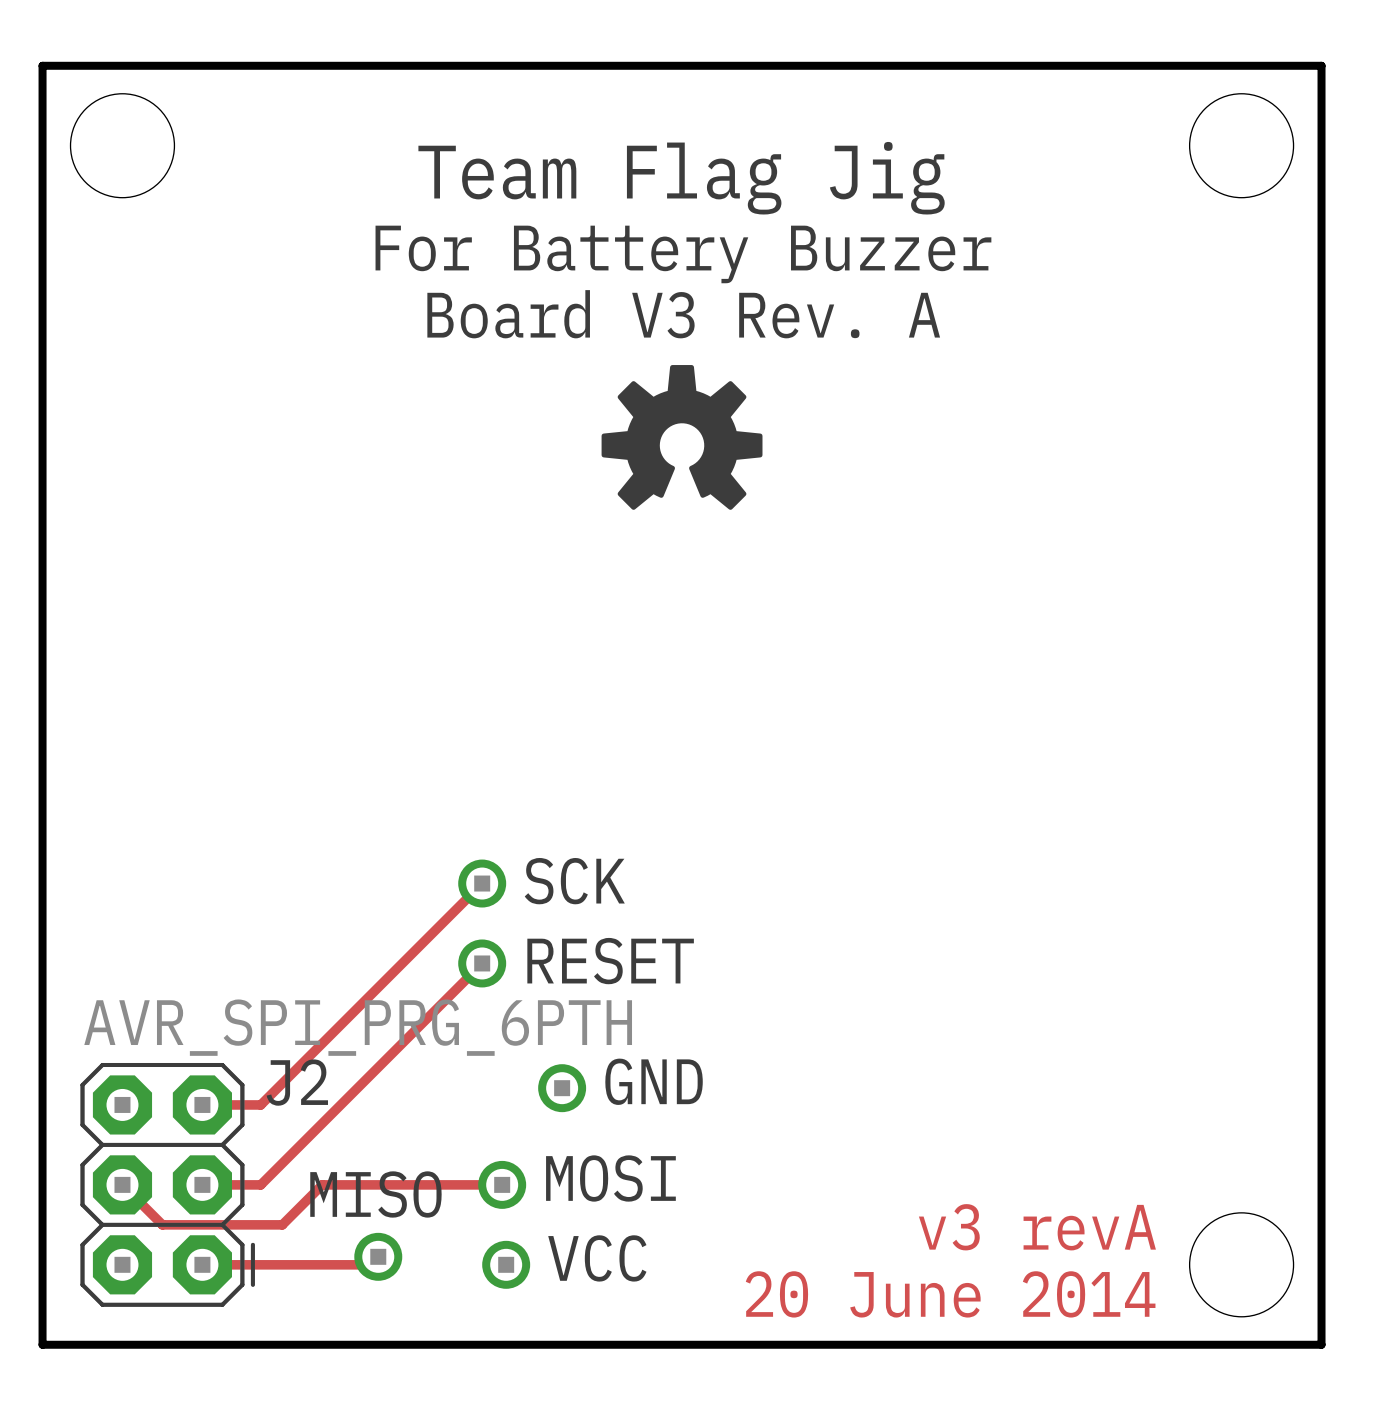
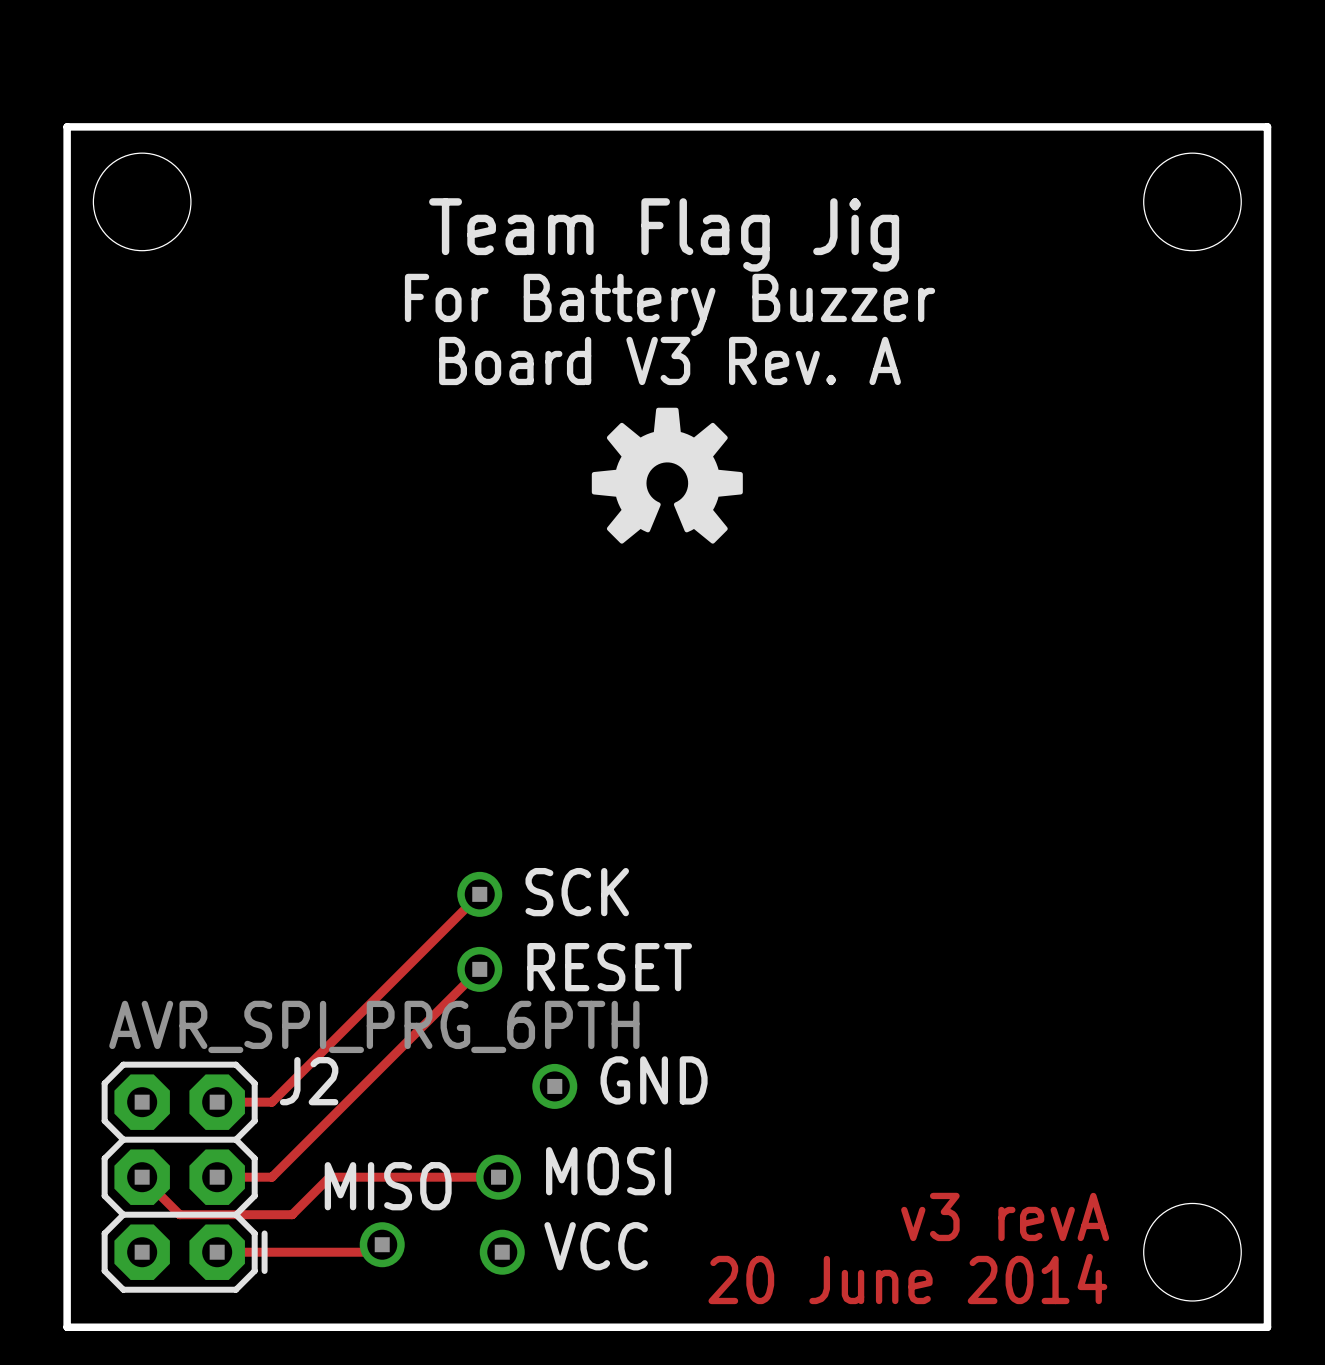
J2 footprint: [80, 1062, 255, 1307] -> [101, 1061, 268, 1293]

